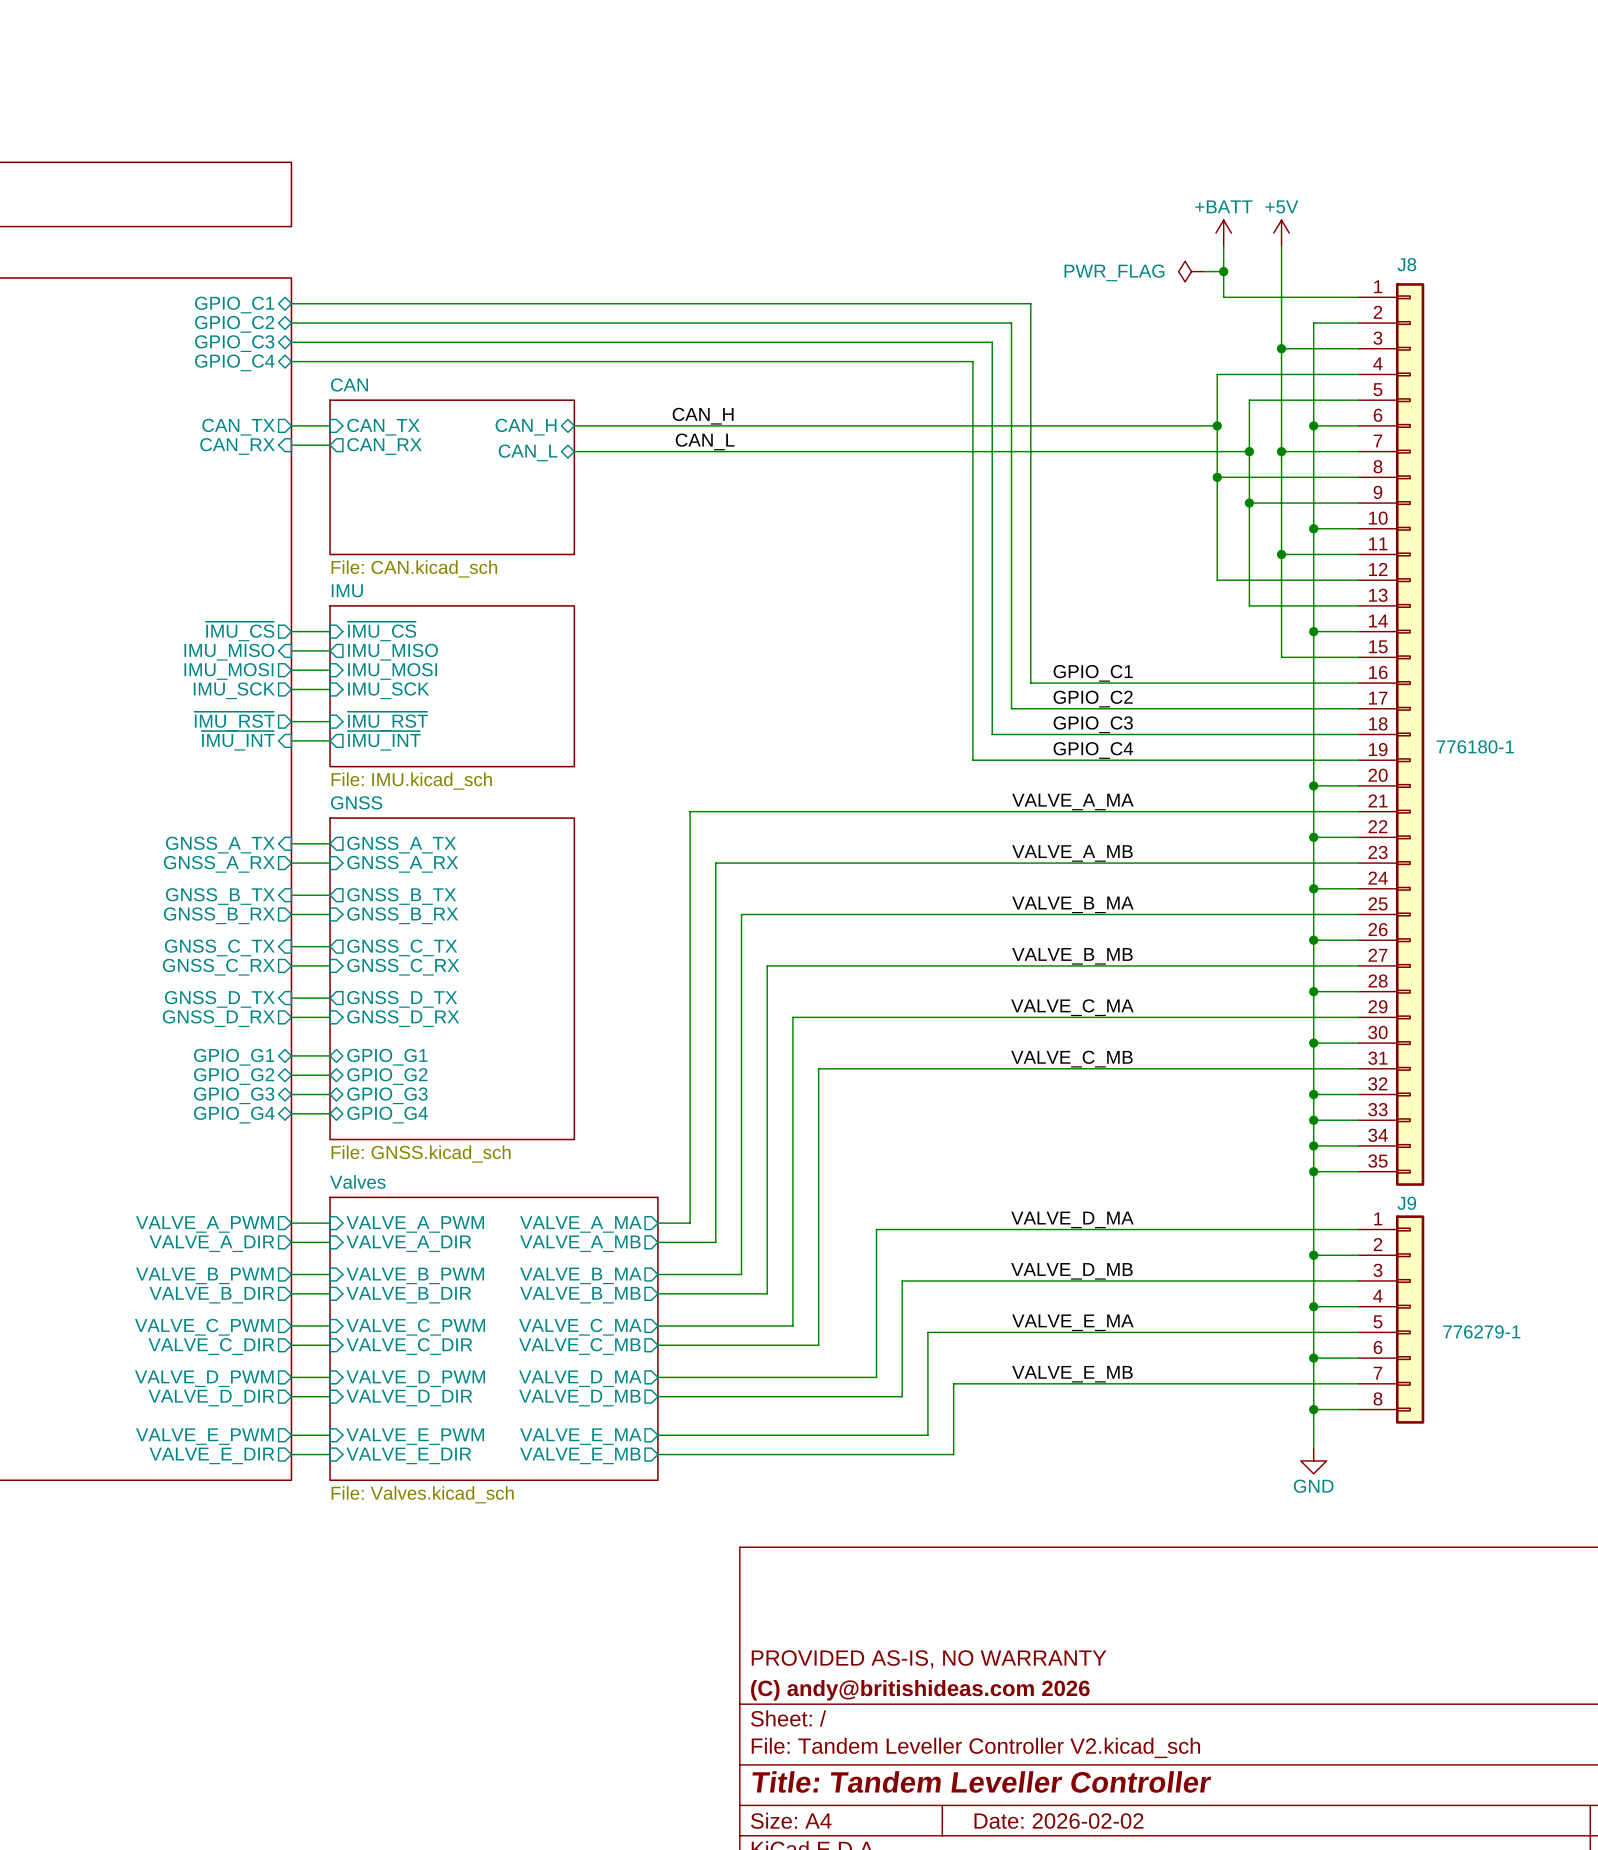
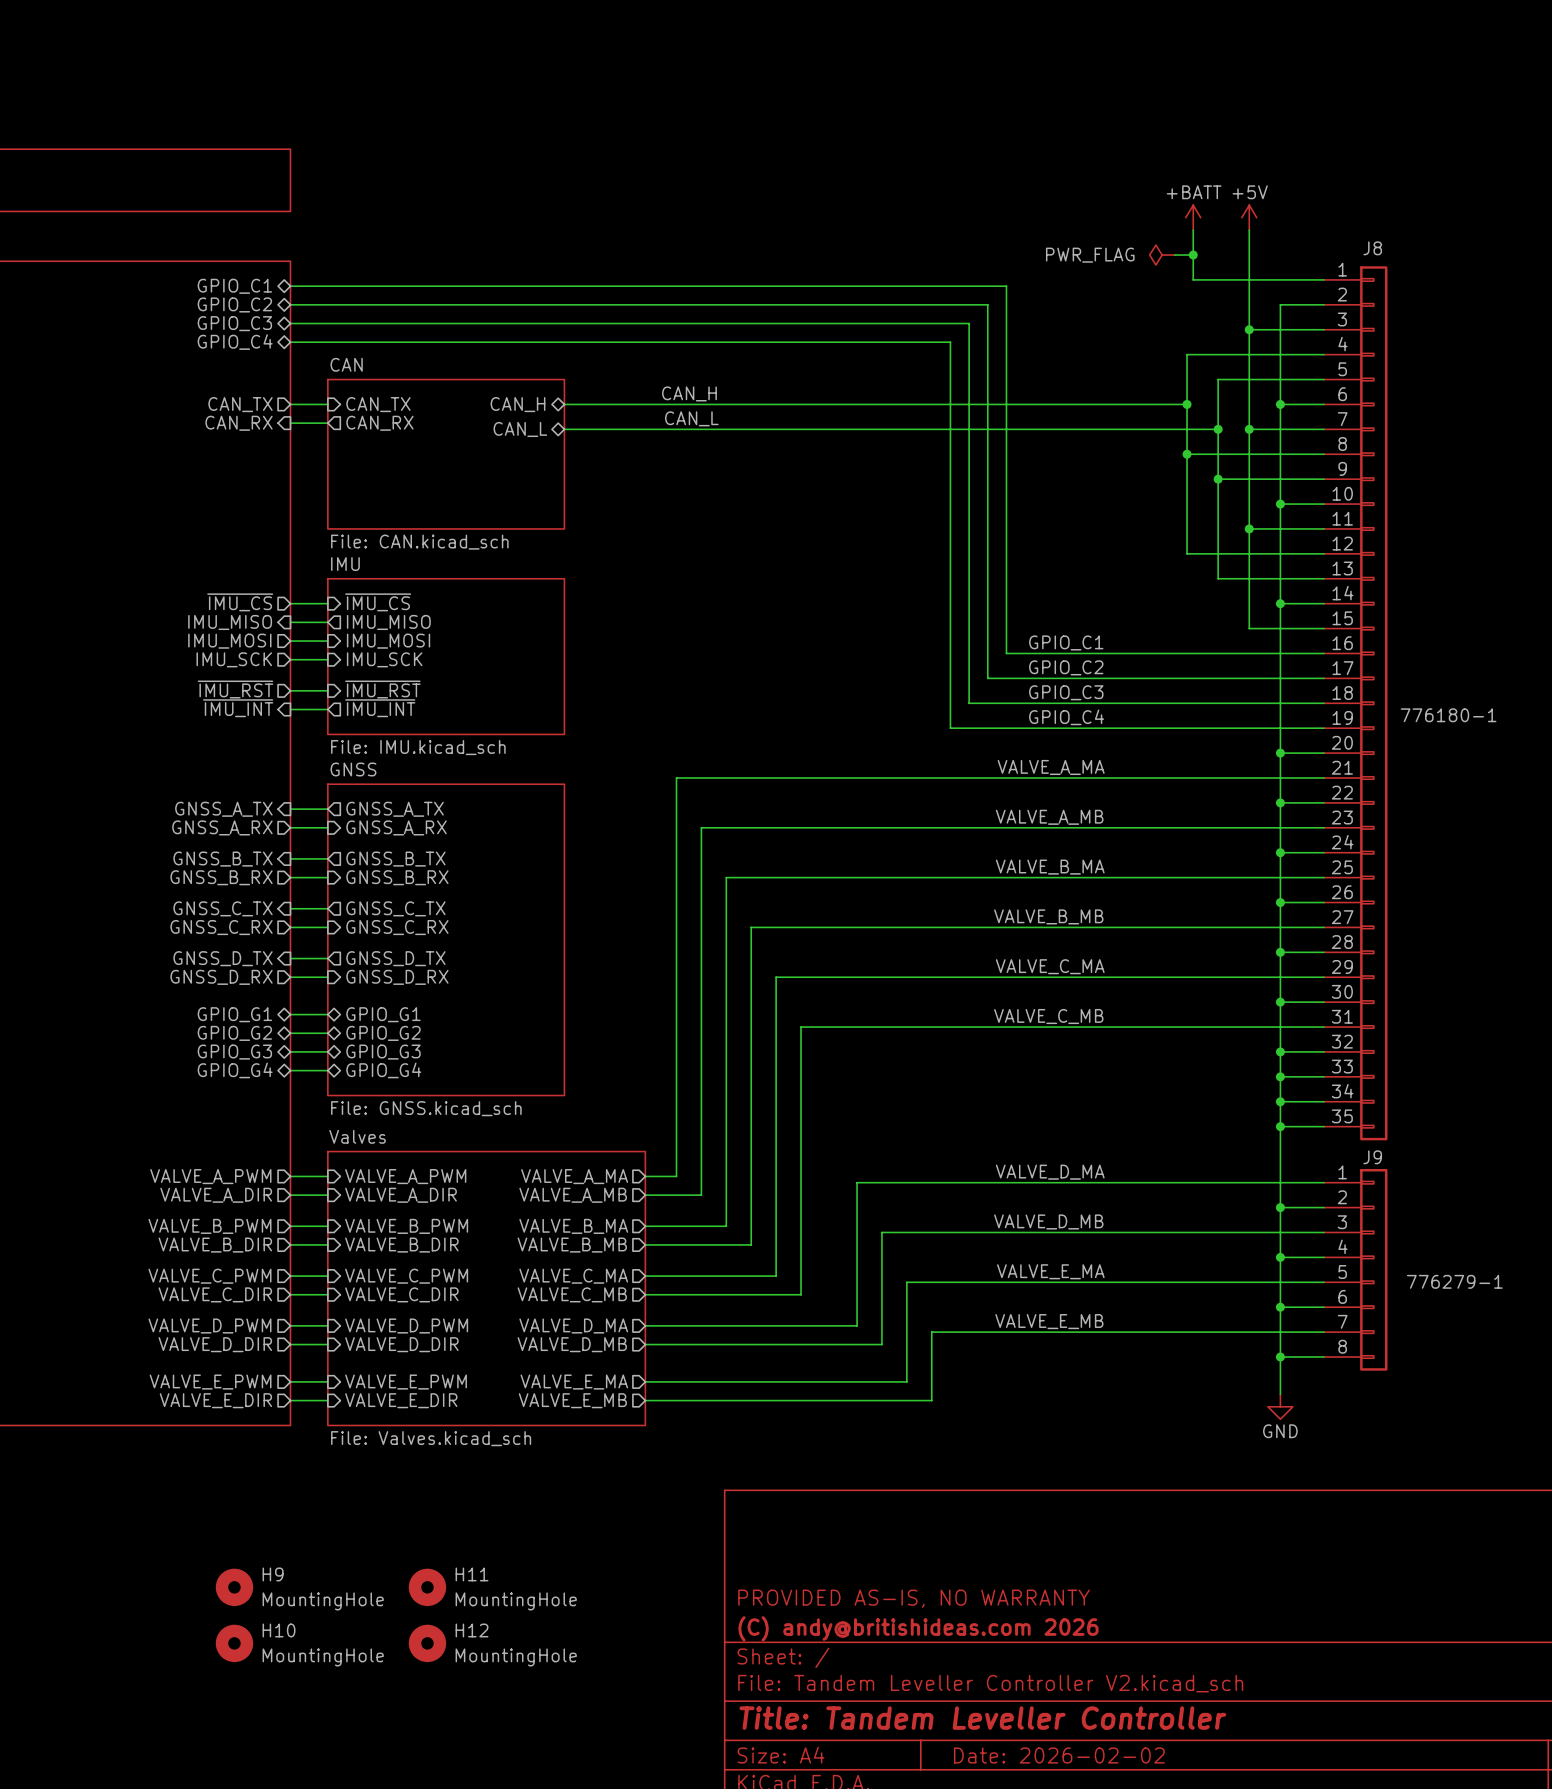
H9: none -> MountingHole (234, 1587)
H11: none -> MountingHole (427, 1587)
H10: none -> MountingHole (234, 1643)
H12: none -> MountingHole (427, 1643)

